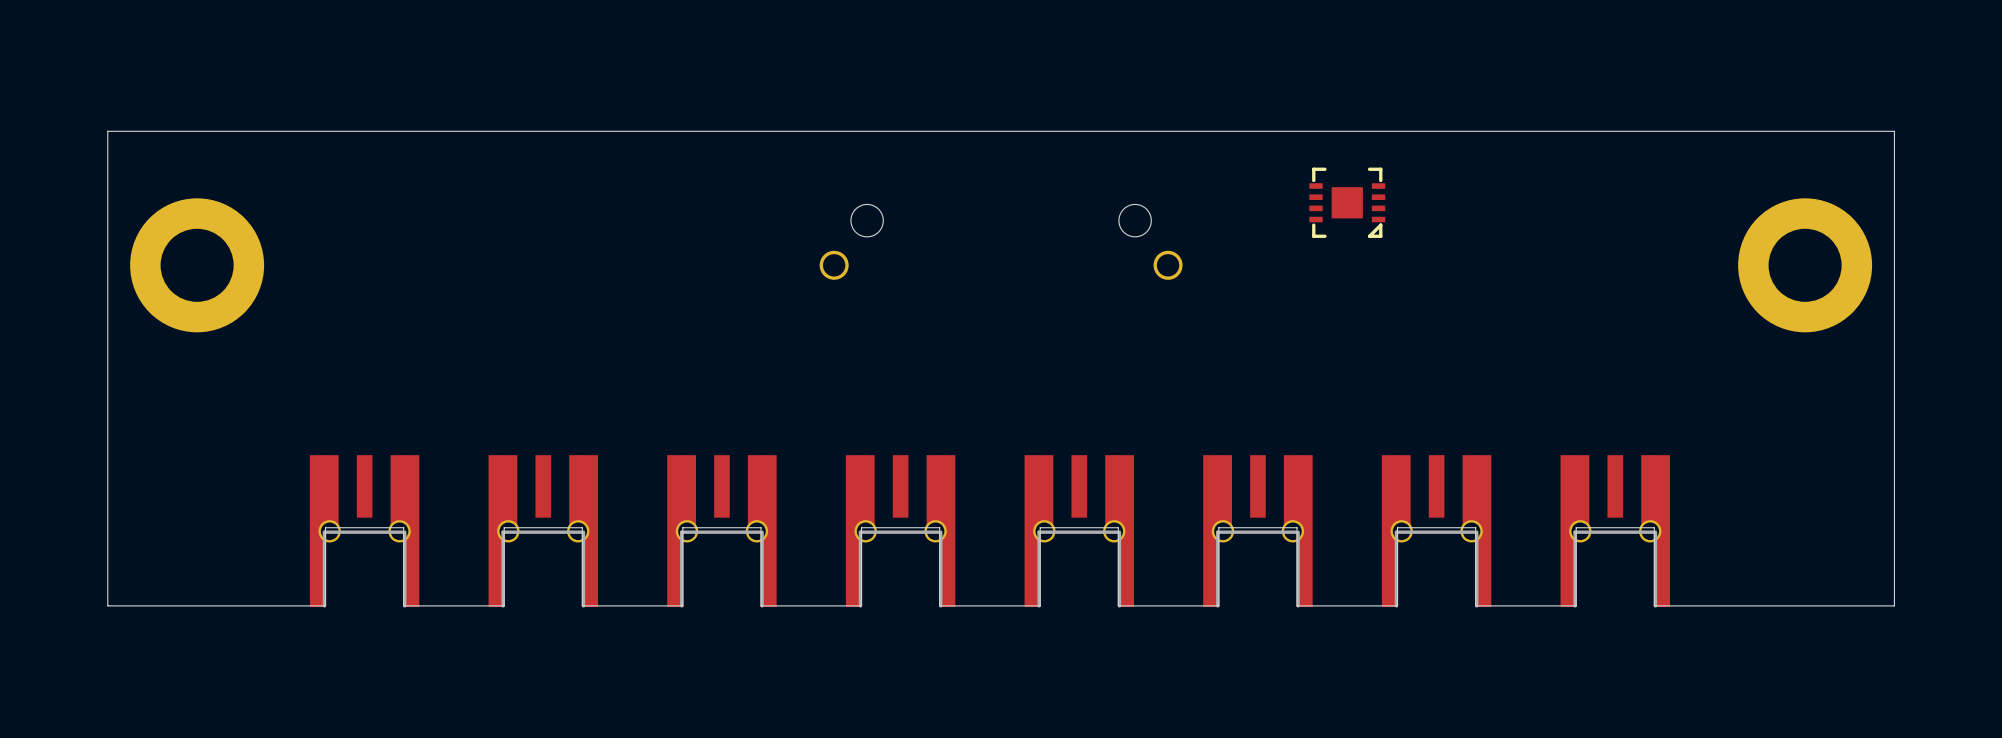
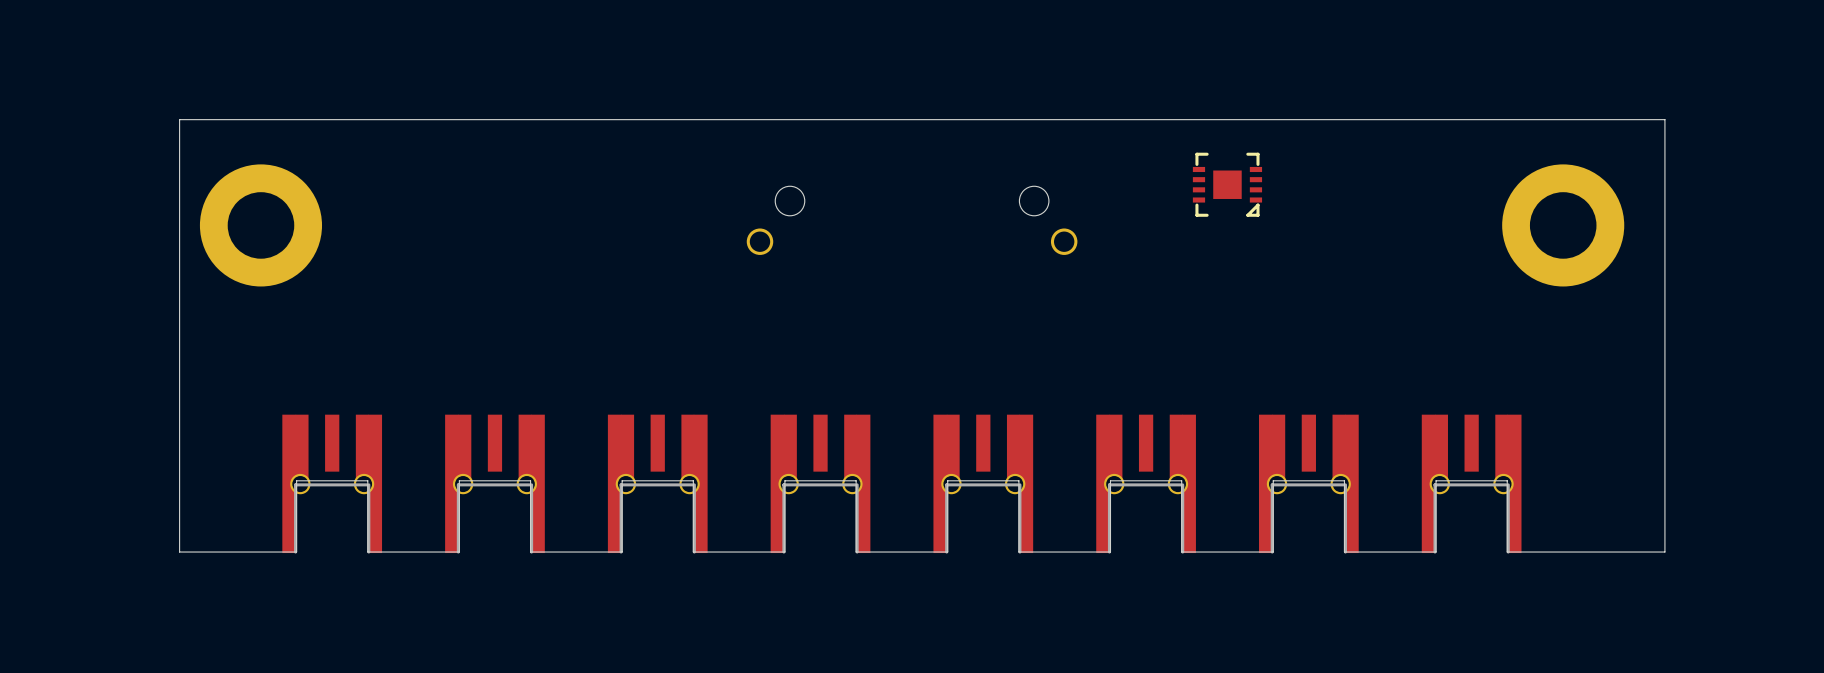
board edge: (197, 131) (107, 131) (107, 605) (197, 605) -> (179, 119) (179, 552)
board edge: (1827, 131) (1894, 131) (1894, 605) (1827, 605) -> (1664, 119) (1664, 552)
part position: (197, 265) -> (260, 225)
part position: (1805, 265) -> (1563, 225)

